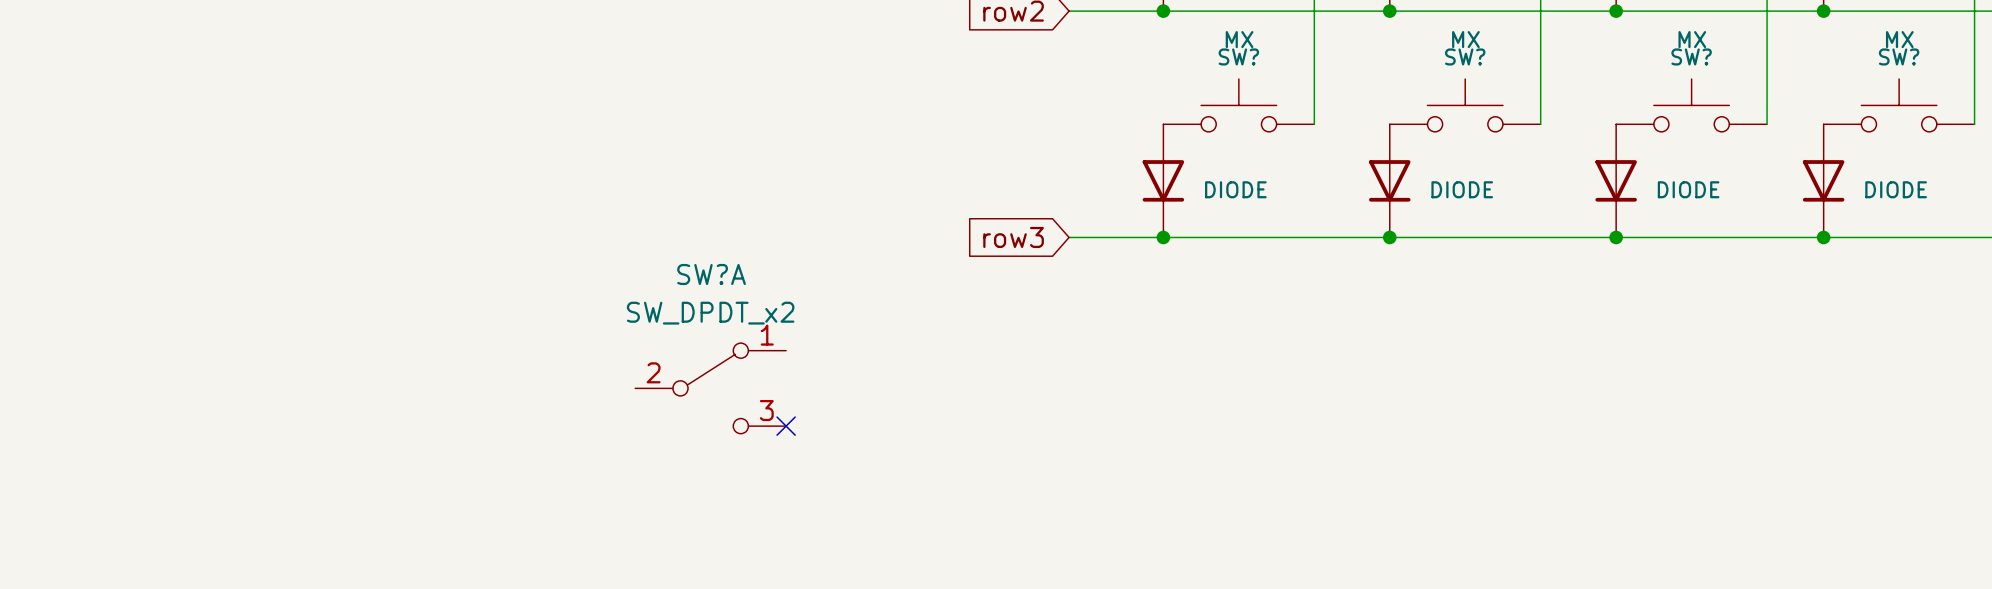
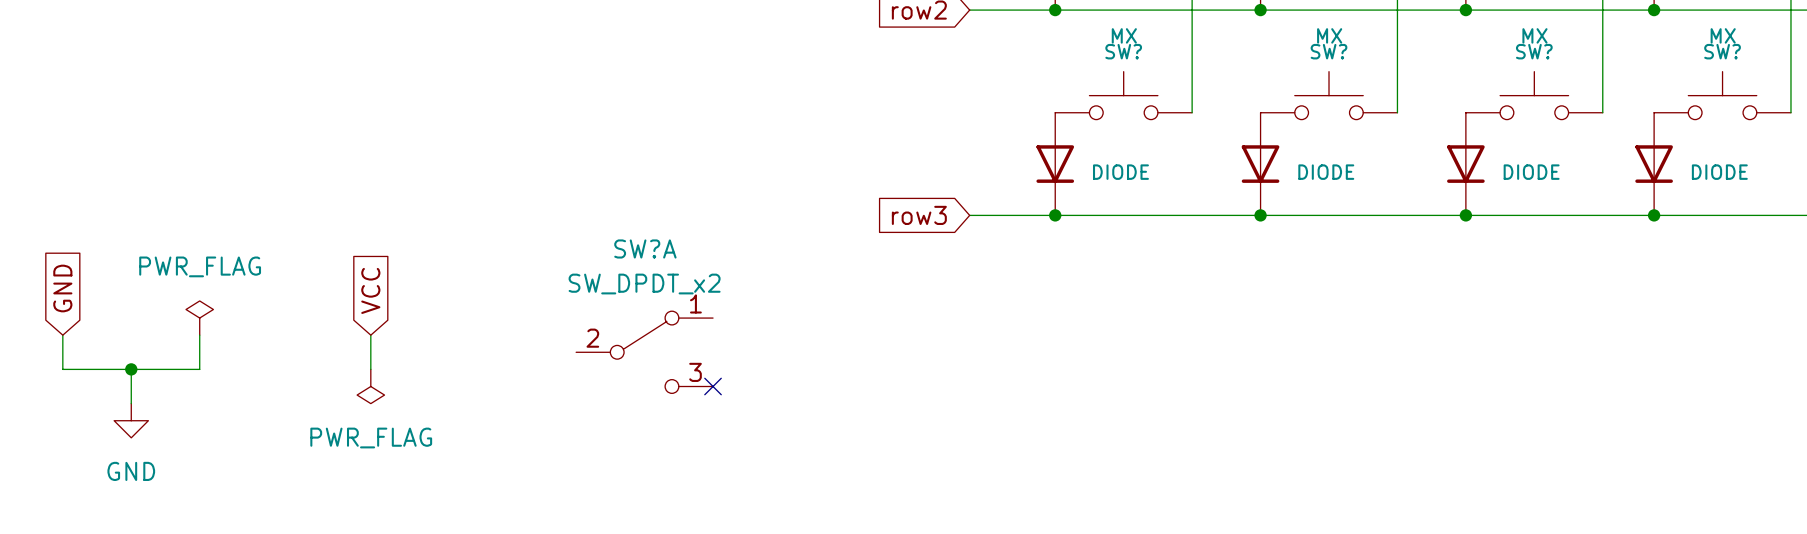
global label: none -> GND (62, 288)
global label: none -> VCC (370, 290)
power symbol: none -> PWR_FLAG (199, 318)
wire: none -> (62, 335) (62, 369) (199, 369) (199, 335)
wire: none -> (370, 335) (370, 369)
wire: none -> (131, 369) (131, 403)
junction: none -> (131, 369)
power symbol: none -> PWR_FLAG (370, 386)
power symbol: none -> GND (131, 420)

